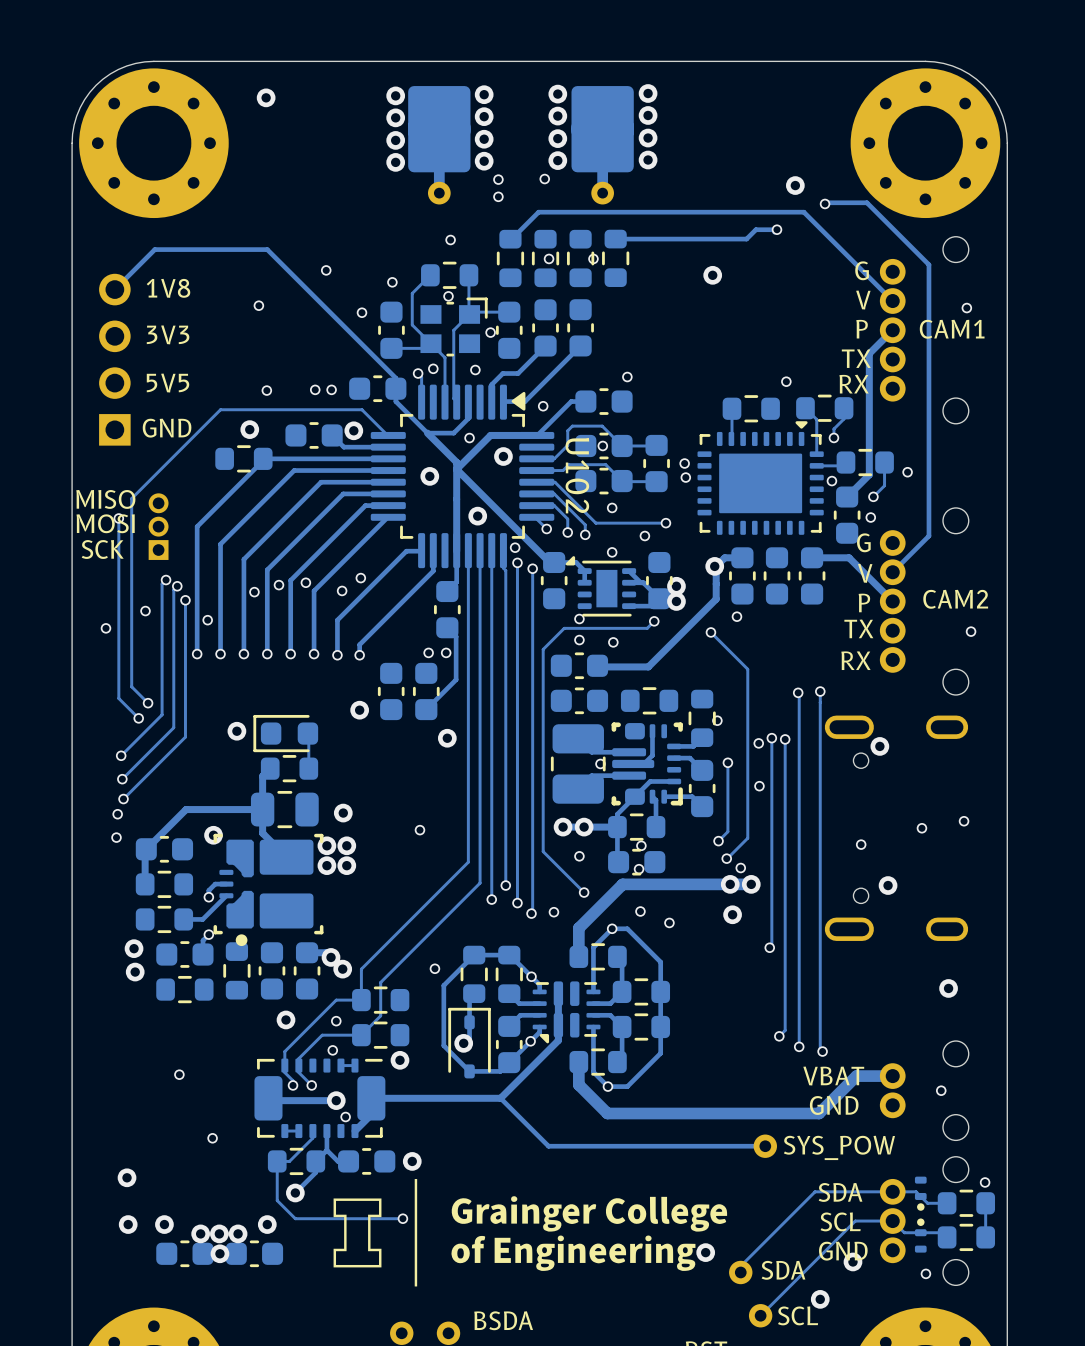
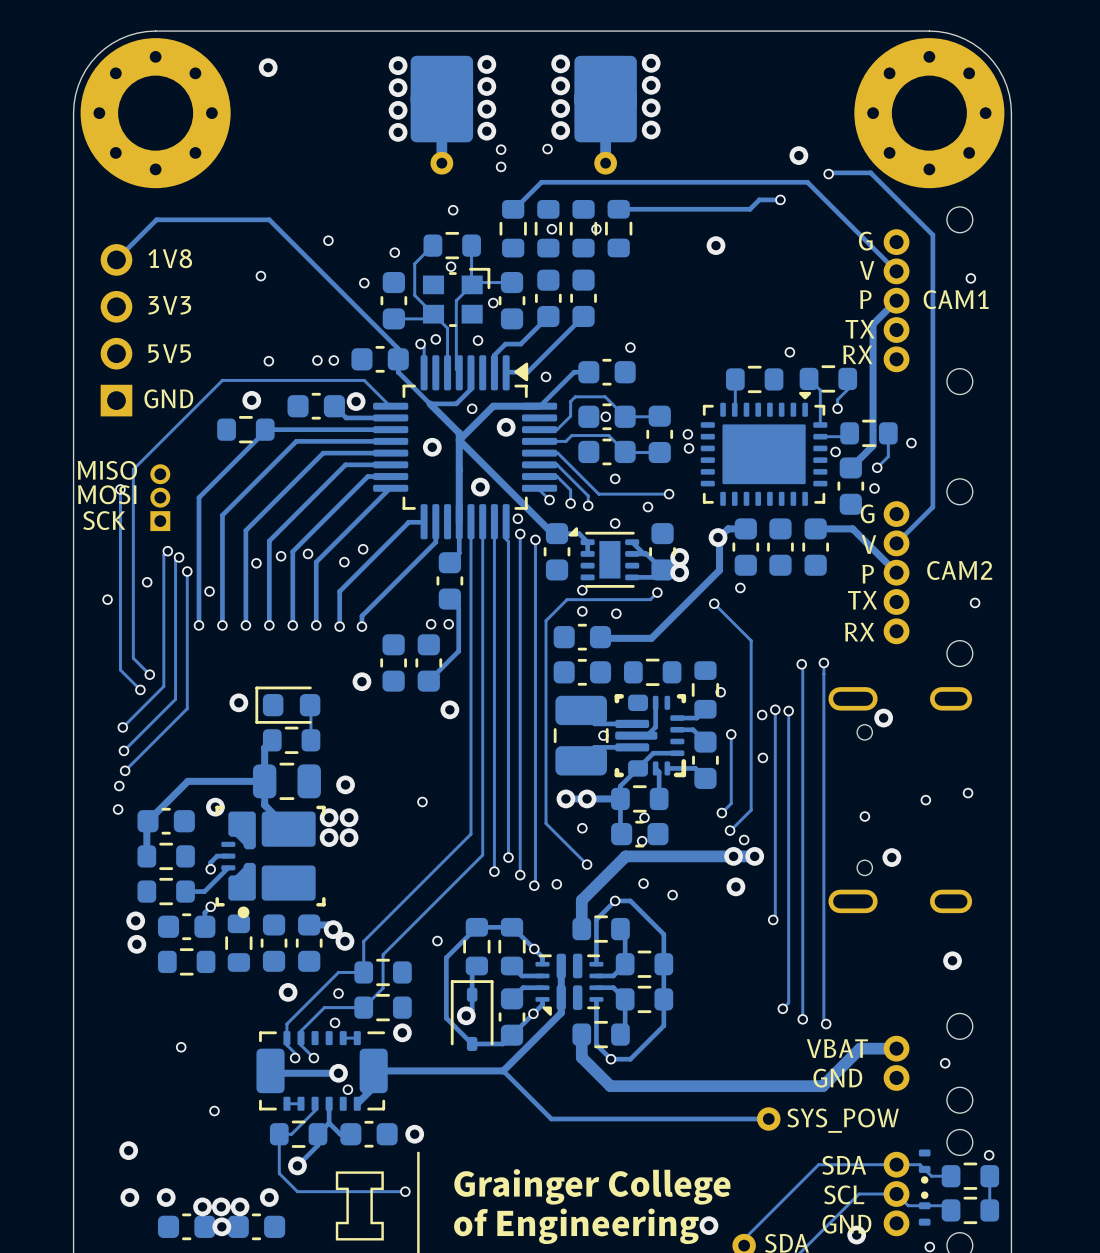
U102 name: U102 (577, 475) -> none

